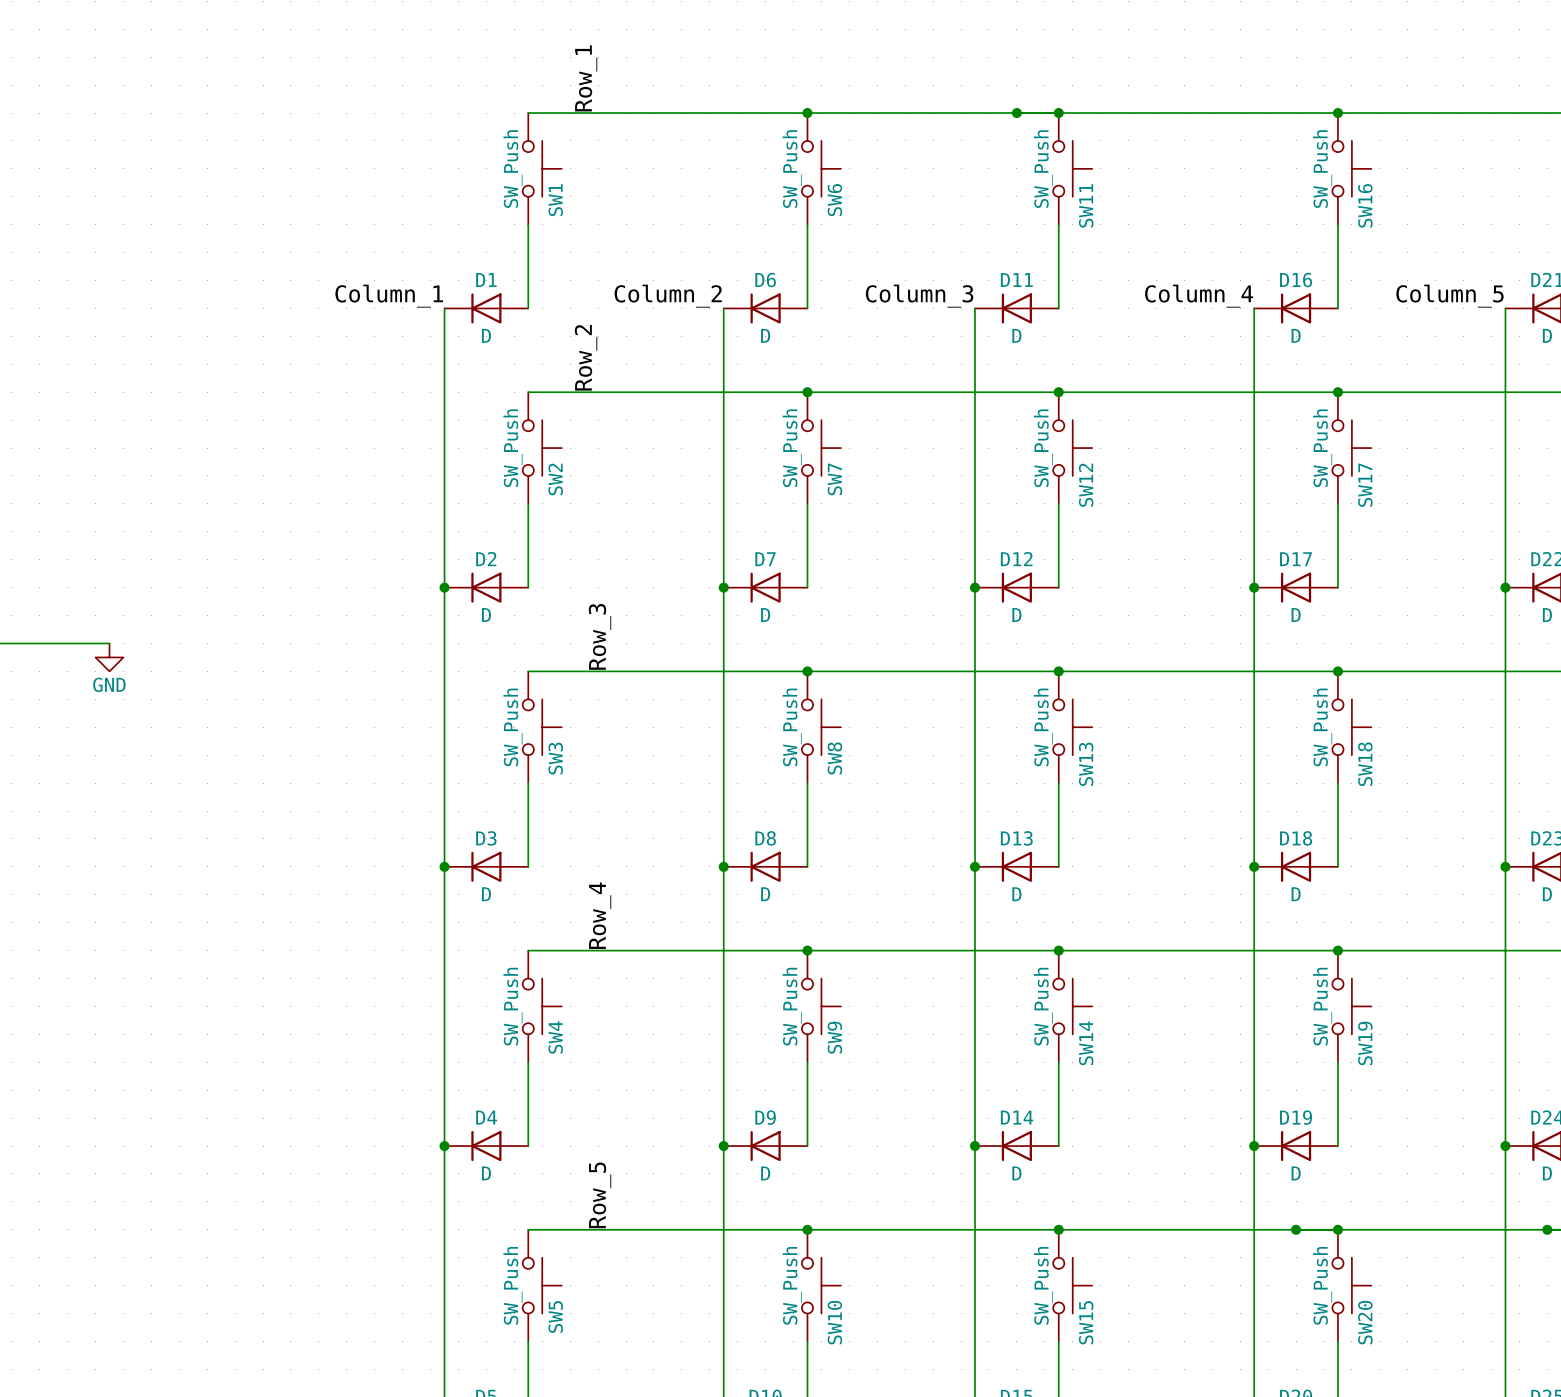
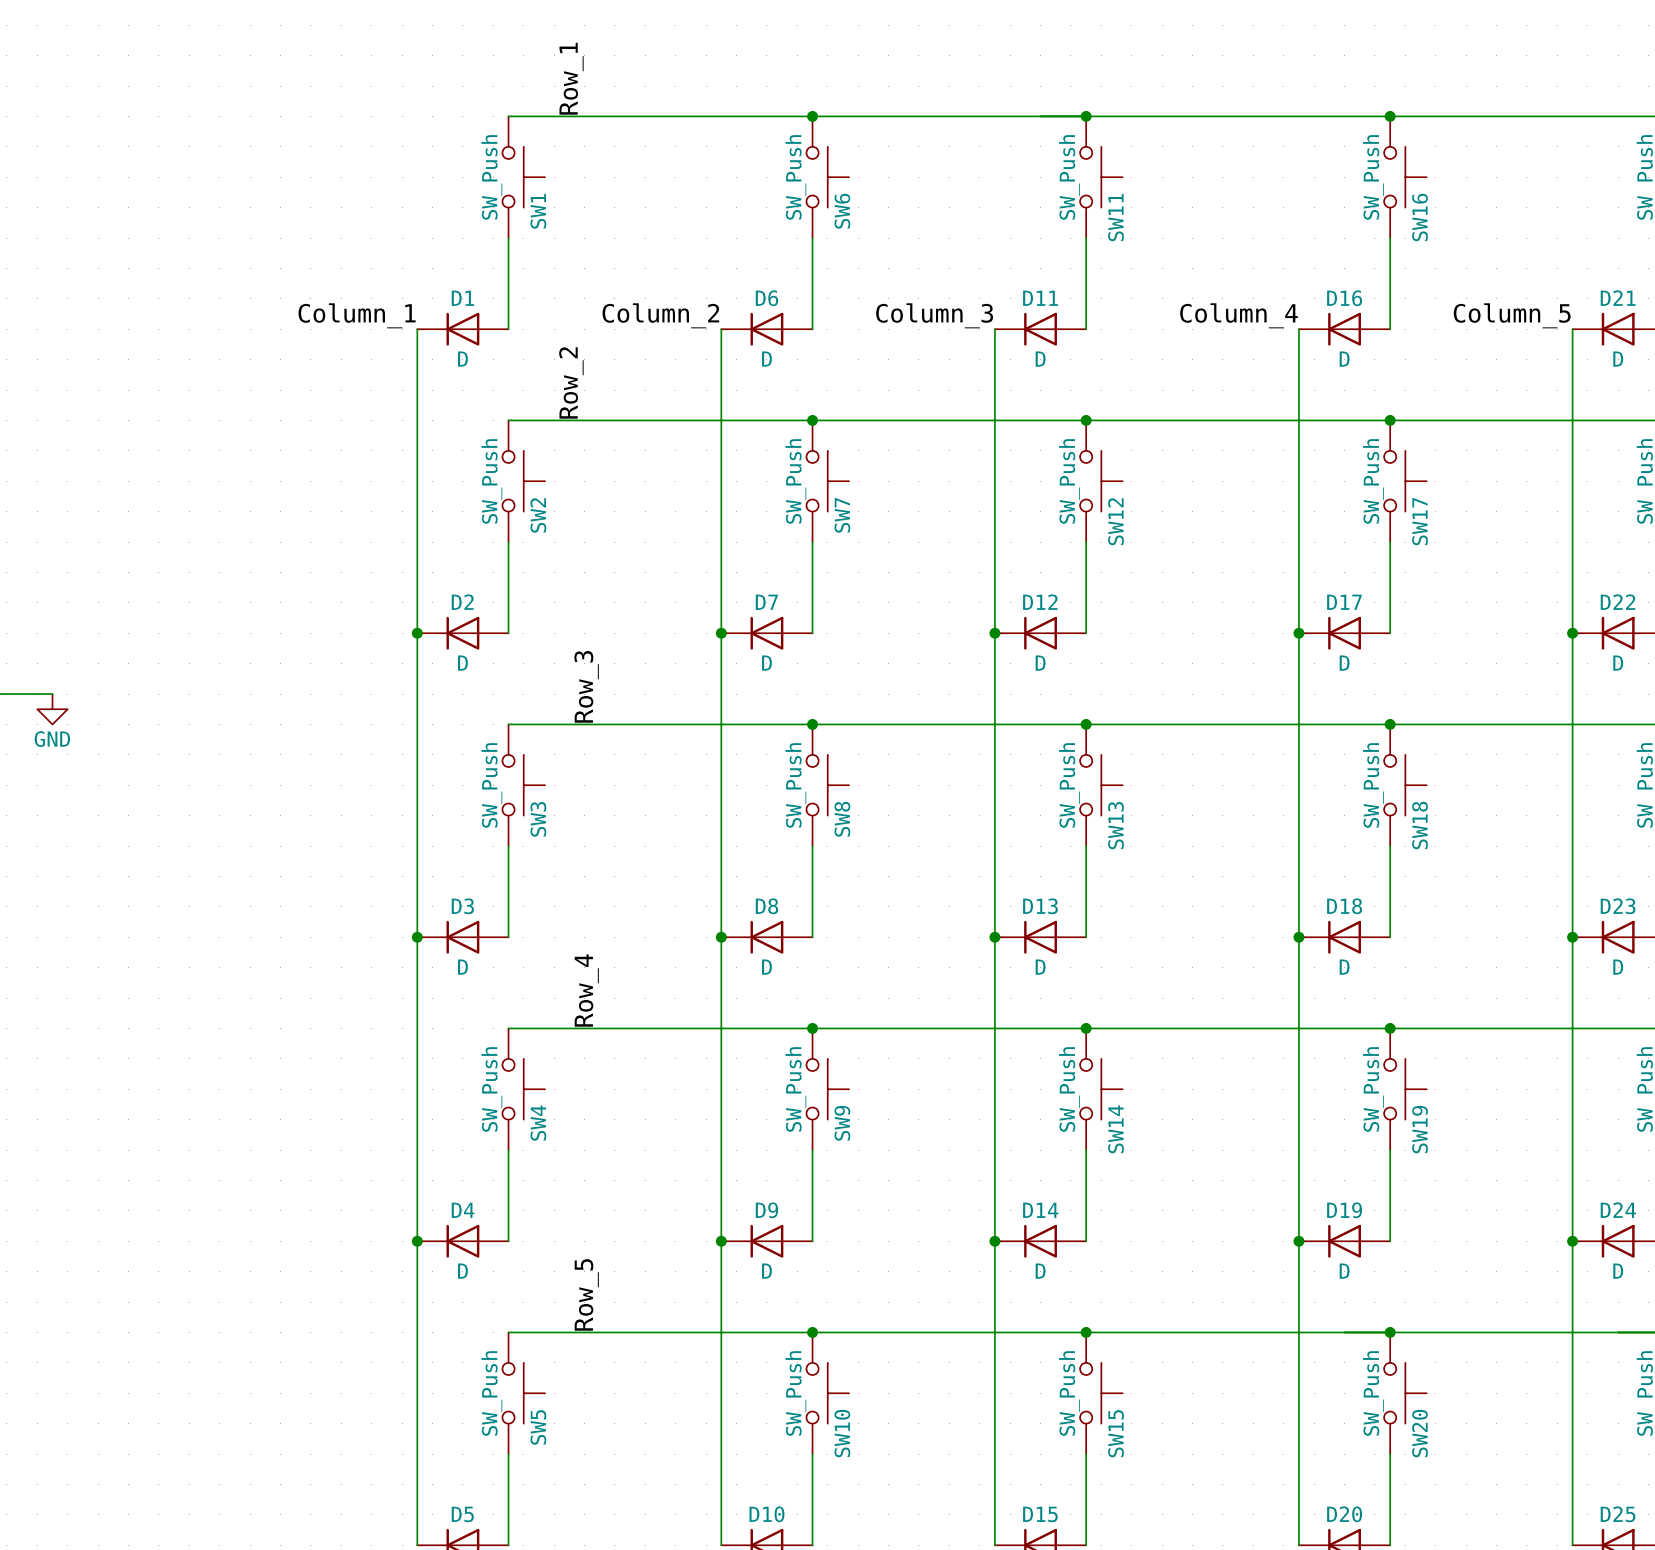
junction: (1016, 113) -> none
junction: (1296, 1229) -> none
junction: (1547, 1229) -> none

